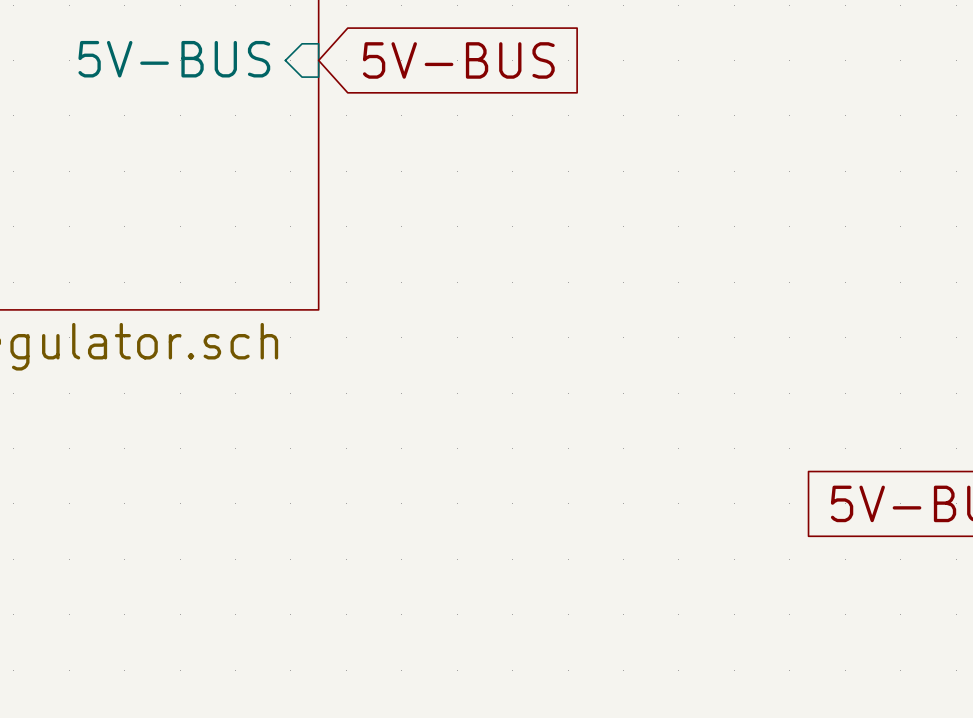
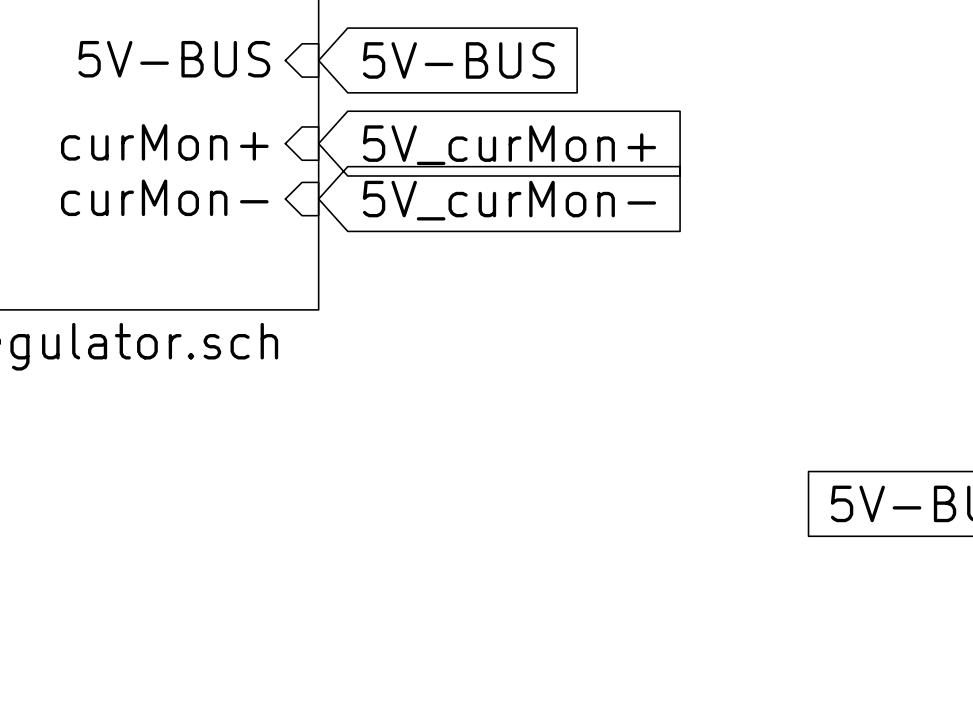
sheet pin: none -> curMon+ (164, 142)
global label: none -> 5V_curMon+ (509, 145)
sheet pin: none -> curMon- (164, 197)
global label: none -> 5V_curMon- (509, 200)

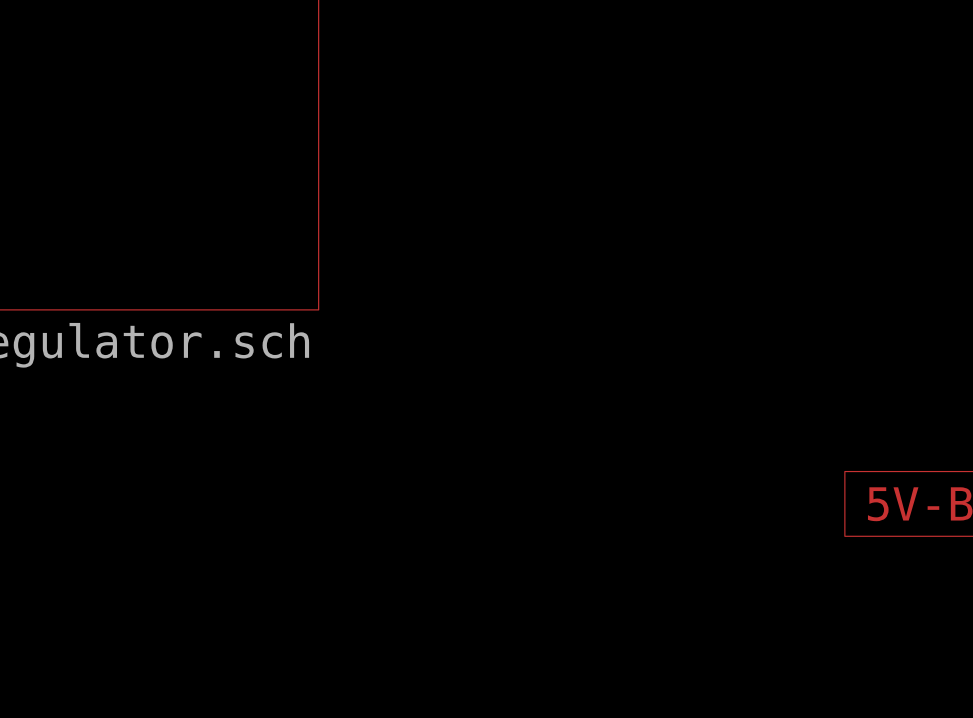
sheet pin: 5V-BUS (174, 59) -> none
global label: 5V-BUS (458, 60) -> none
sheet pin: curMon+ (164, 142) -> none
global label: 5V_curMon+ (509, 145) -> none
sheet pin: curMon- (164, 197) -> none
global label: 5V_curMon- (509, 200) -> none

